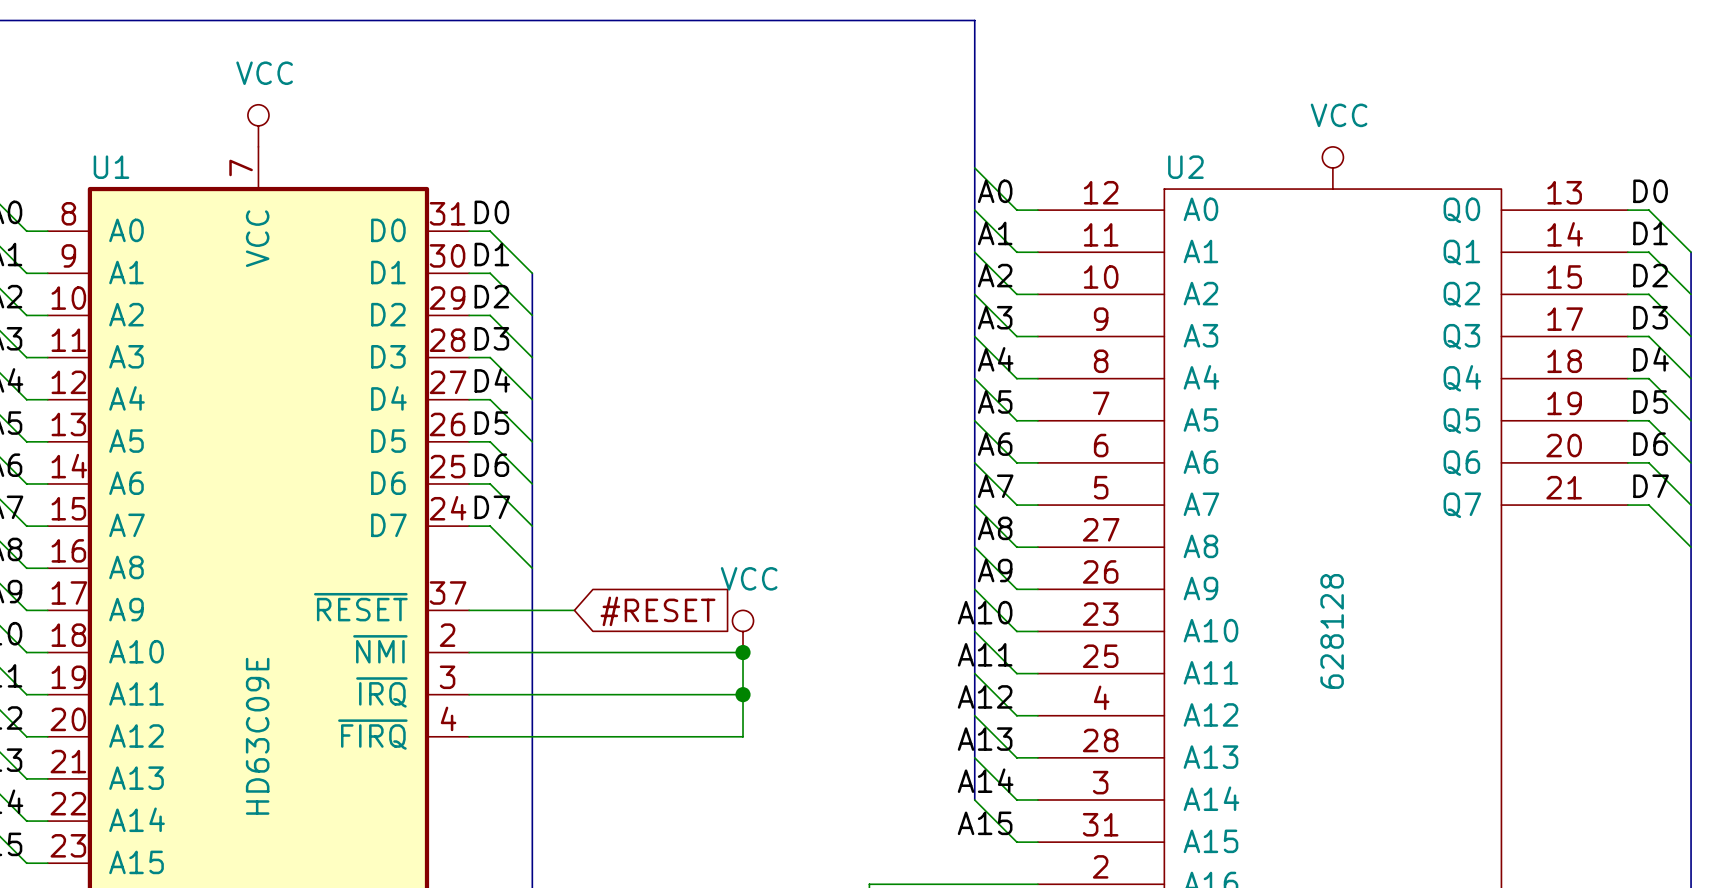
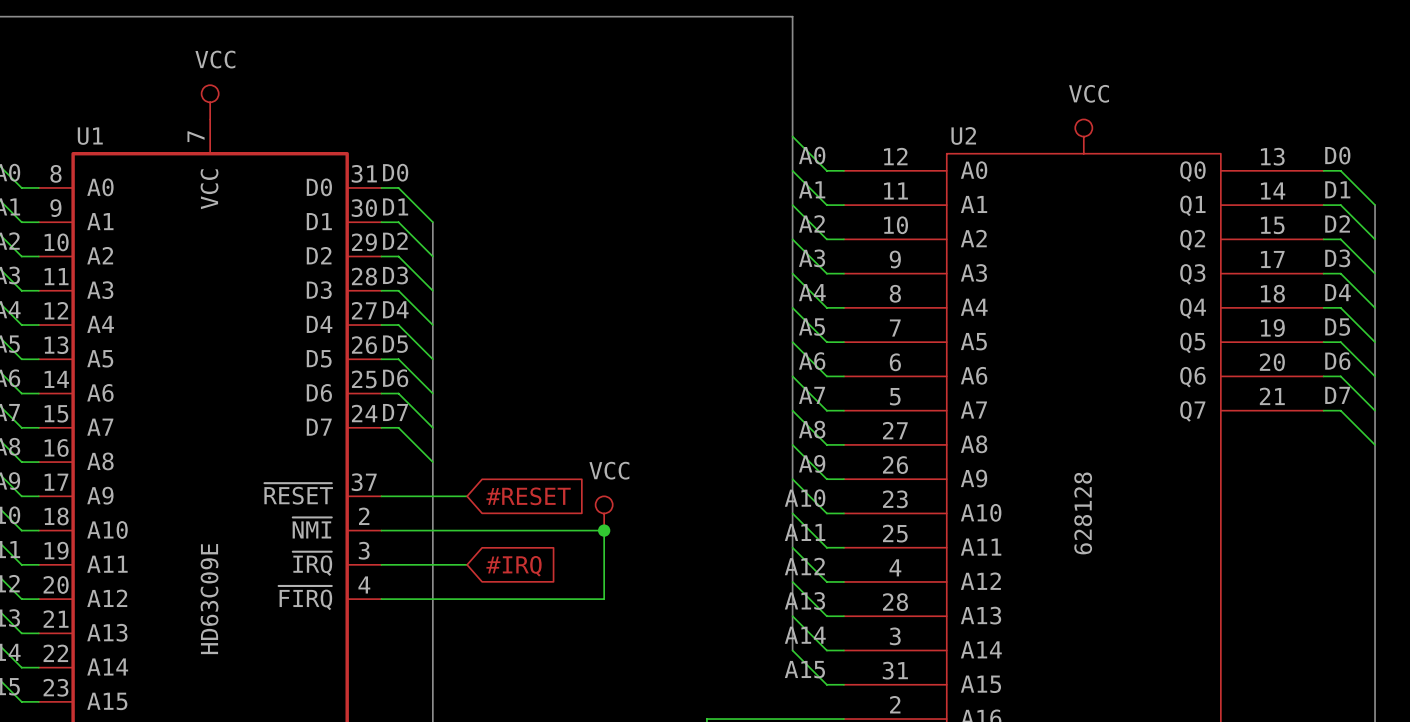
wire: (574, 694) (743, 694) -> none
junction: (743, 694) -> none
global label: none -> #IRQ (514, 566)

